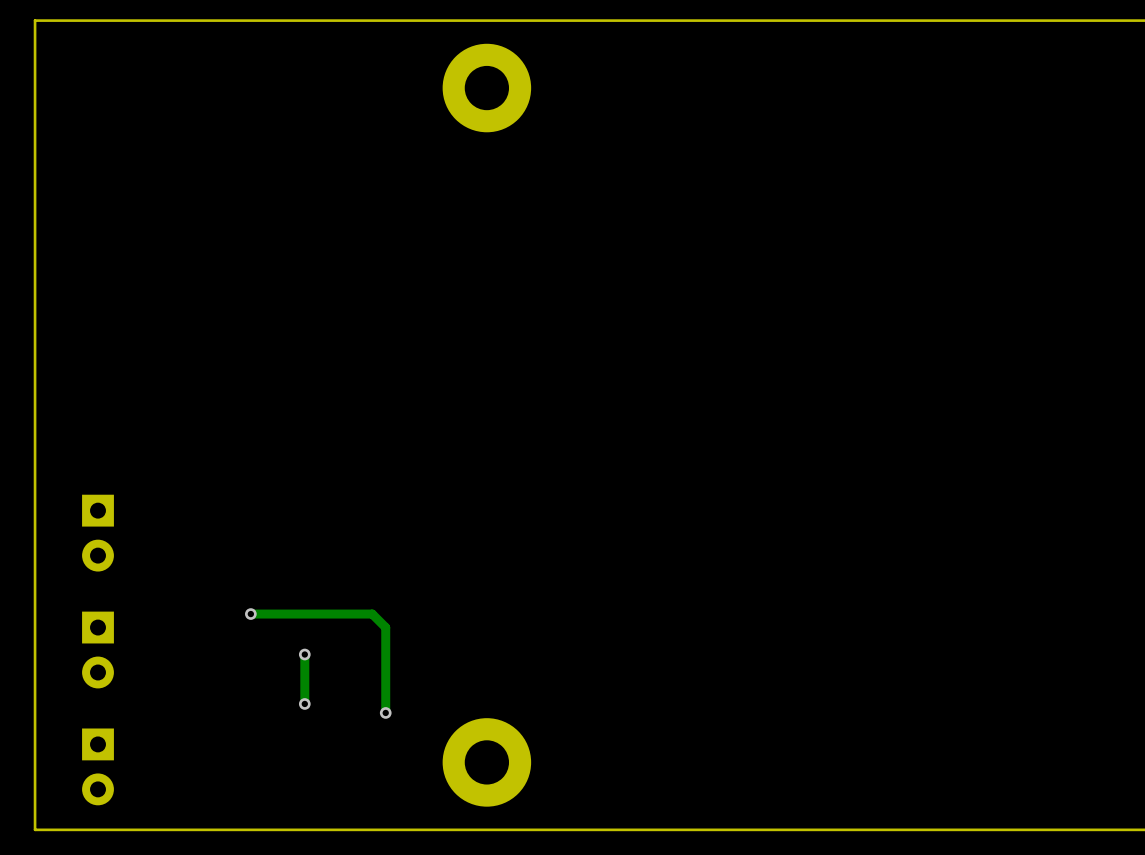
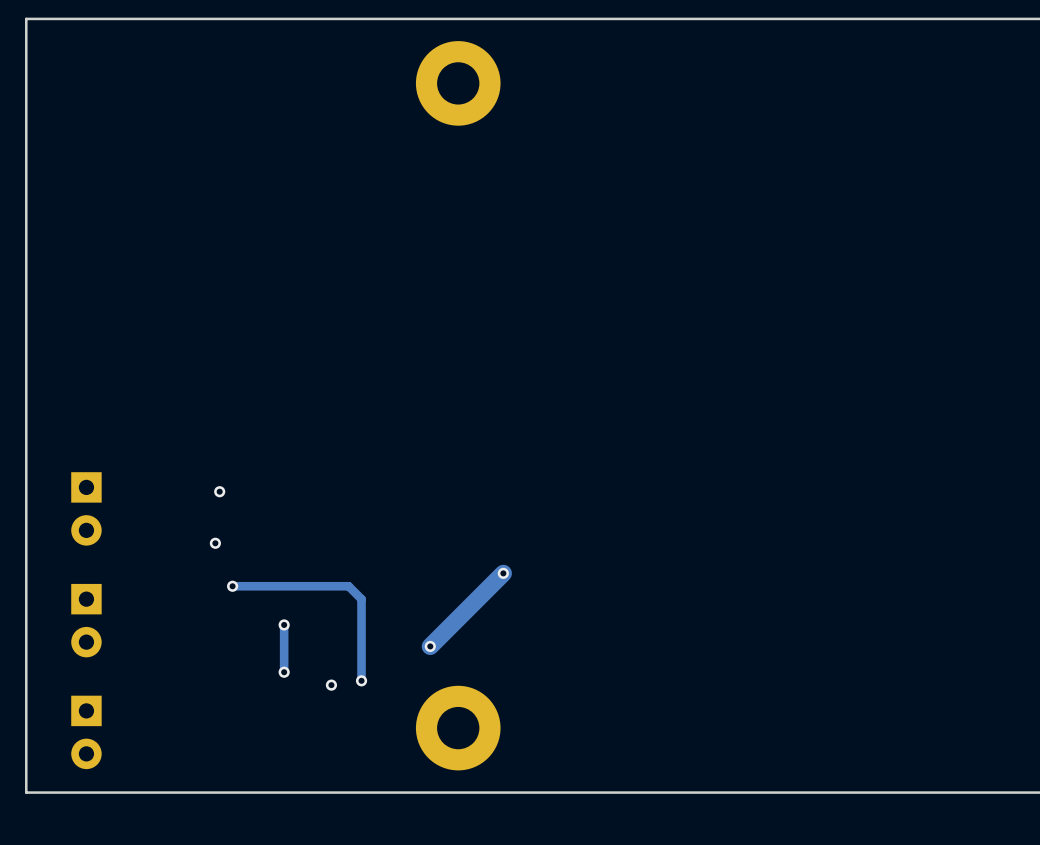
via: none -> (219, 491)
via: none -> (215, 543)
track: none -> (503, 573) (430, 646)
via: none -> (503, 573)
via: none -> (430, 646)
via: none -> (331, 685)

